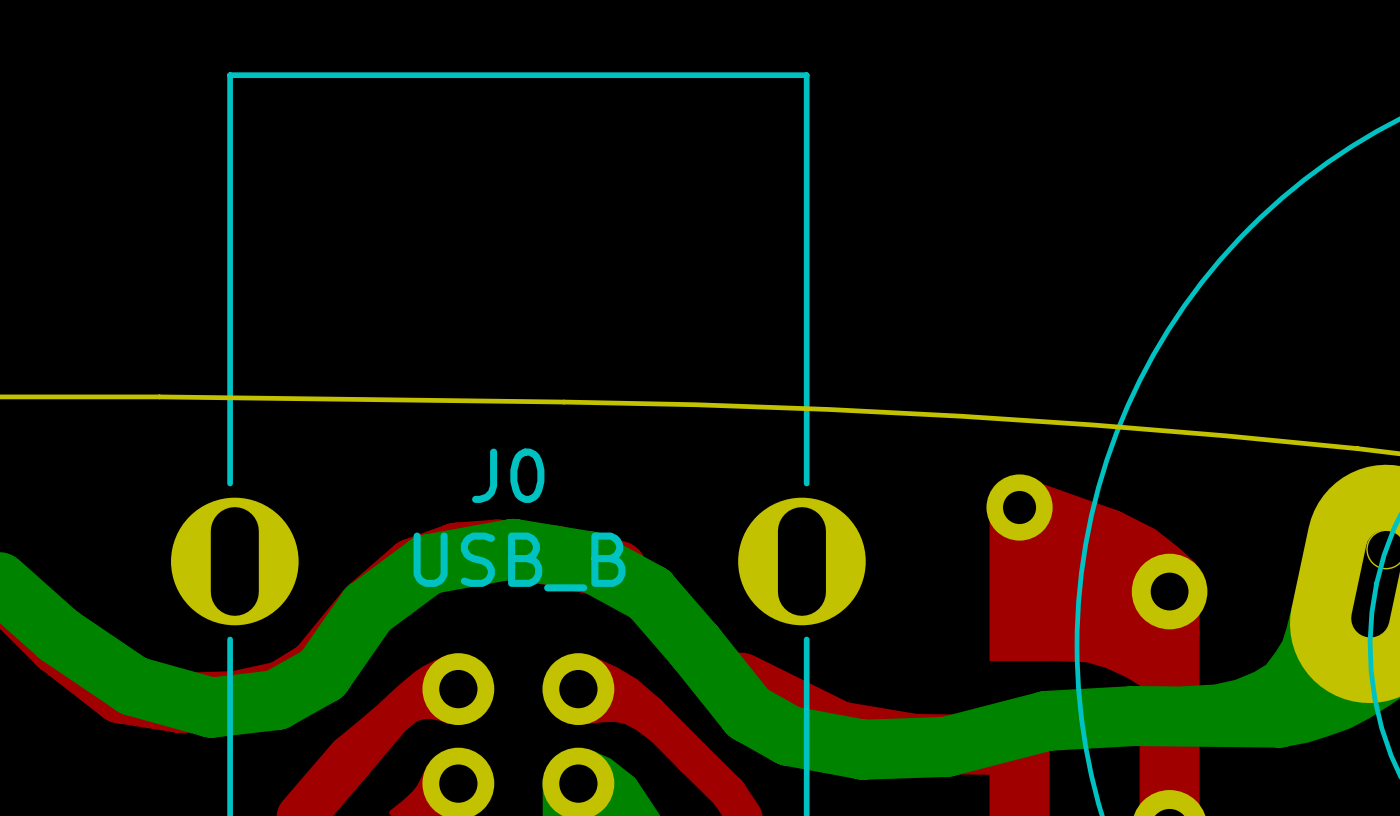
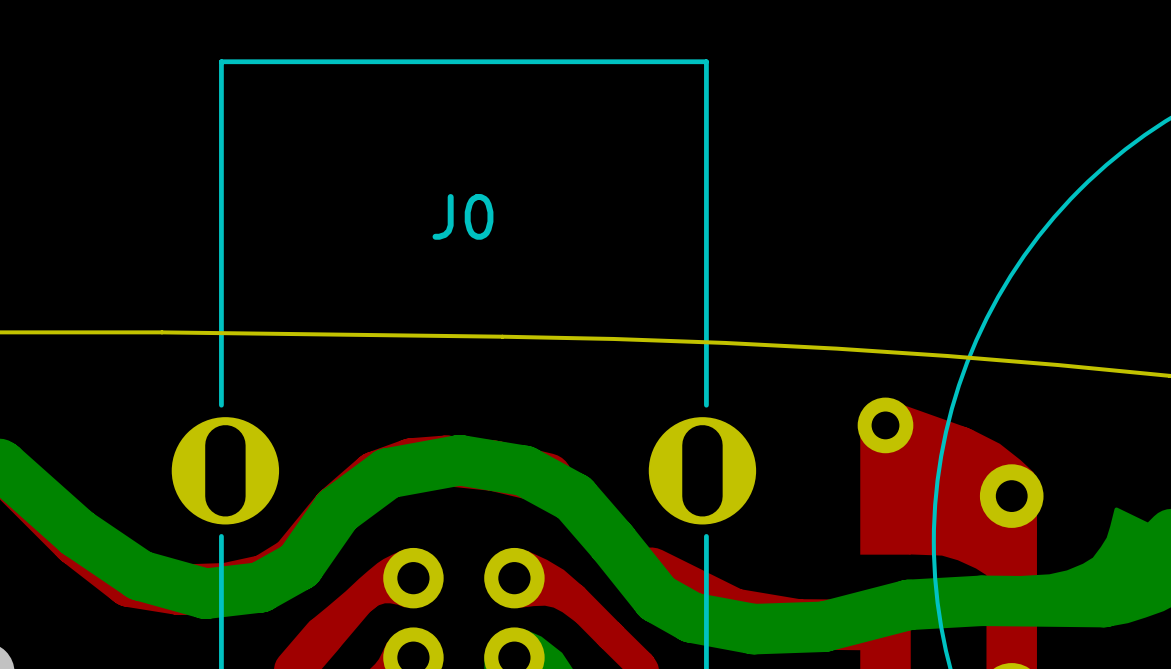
J0 name position: J0 (508, 475) -> J0 (462, 216)
J0 value: USB_B (519, 561) -> none

